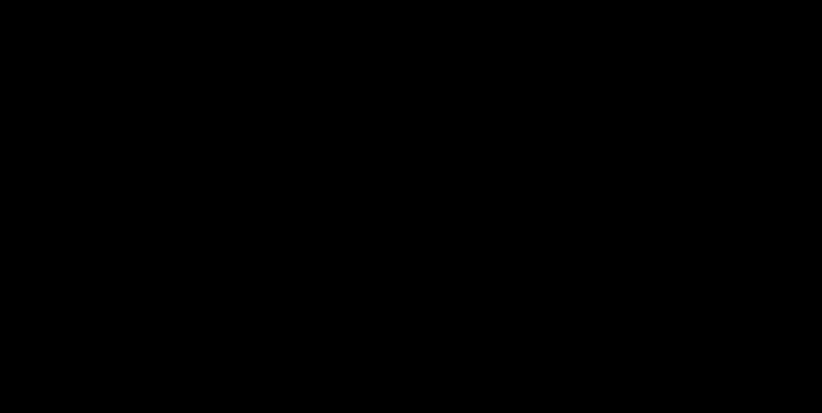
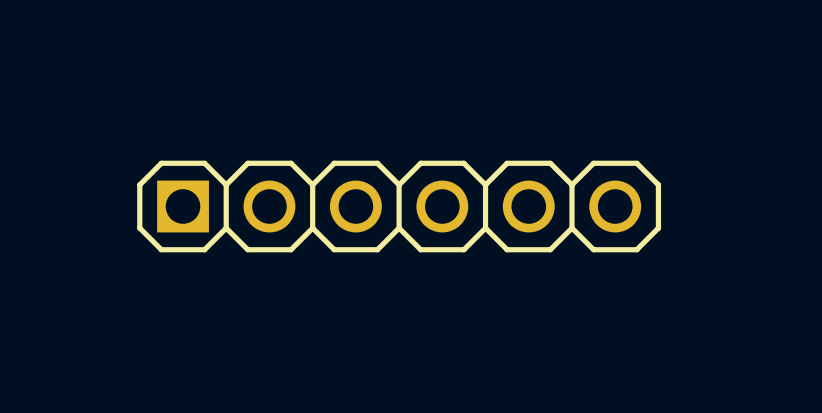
part: none -> (399, 206)

